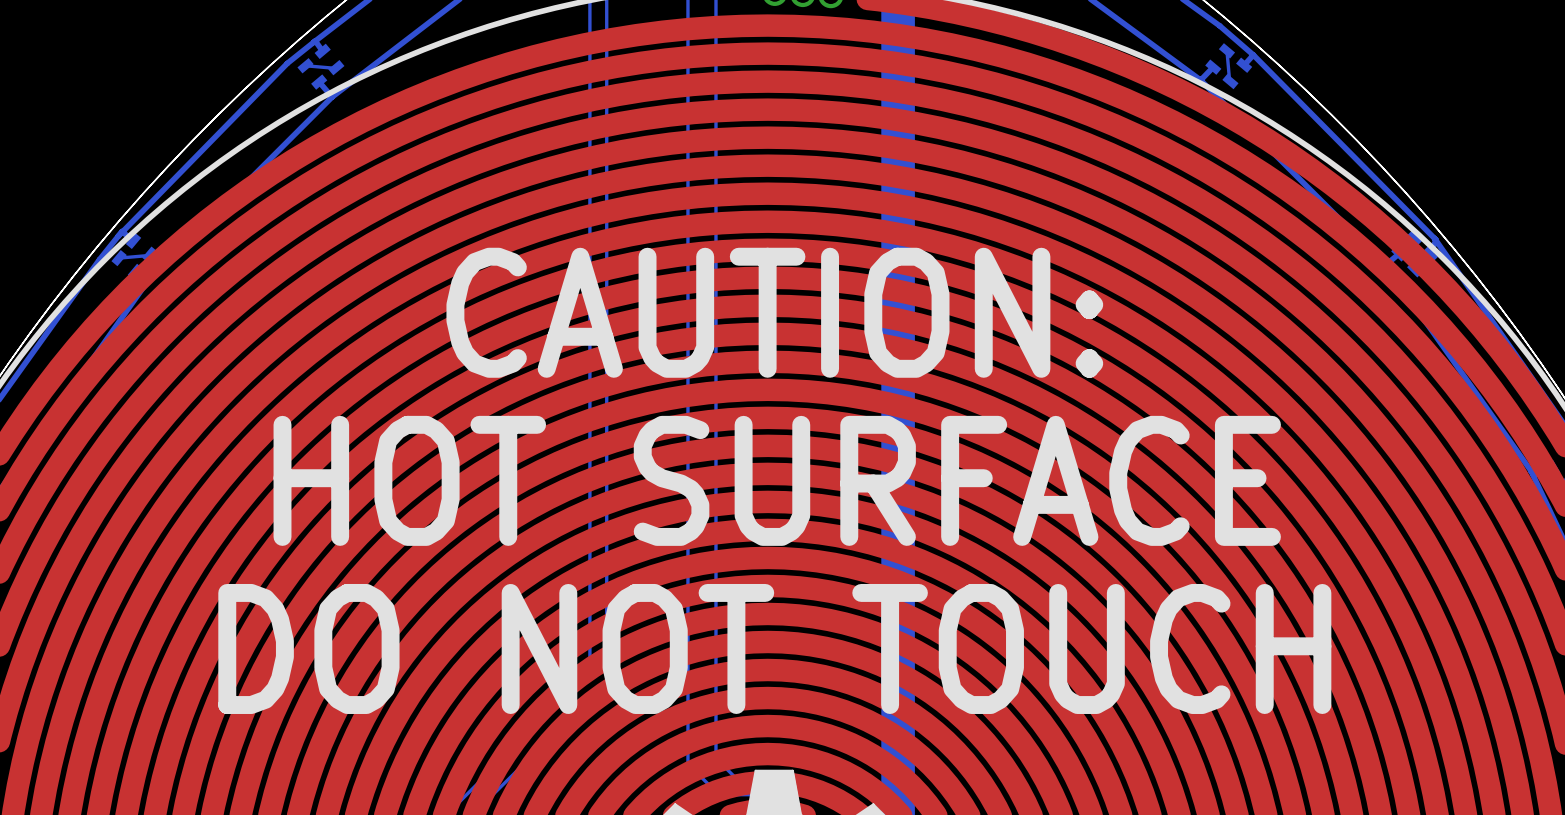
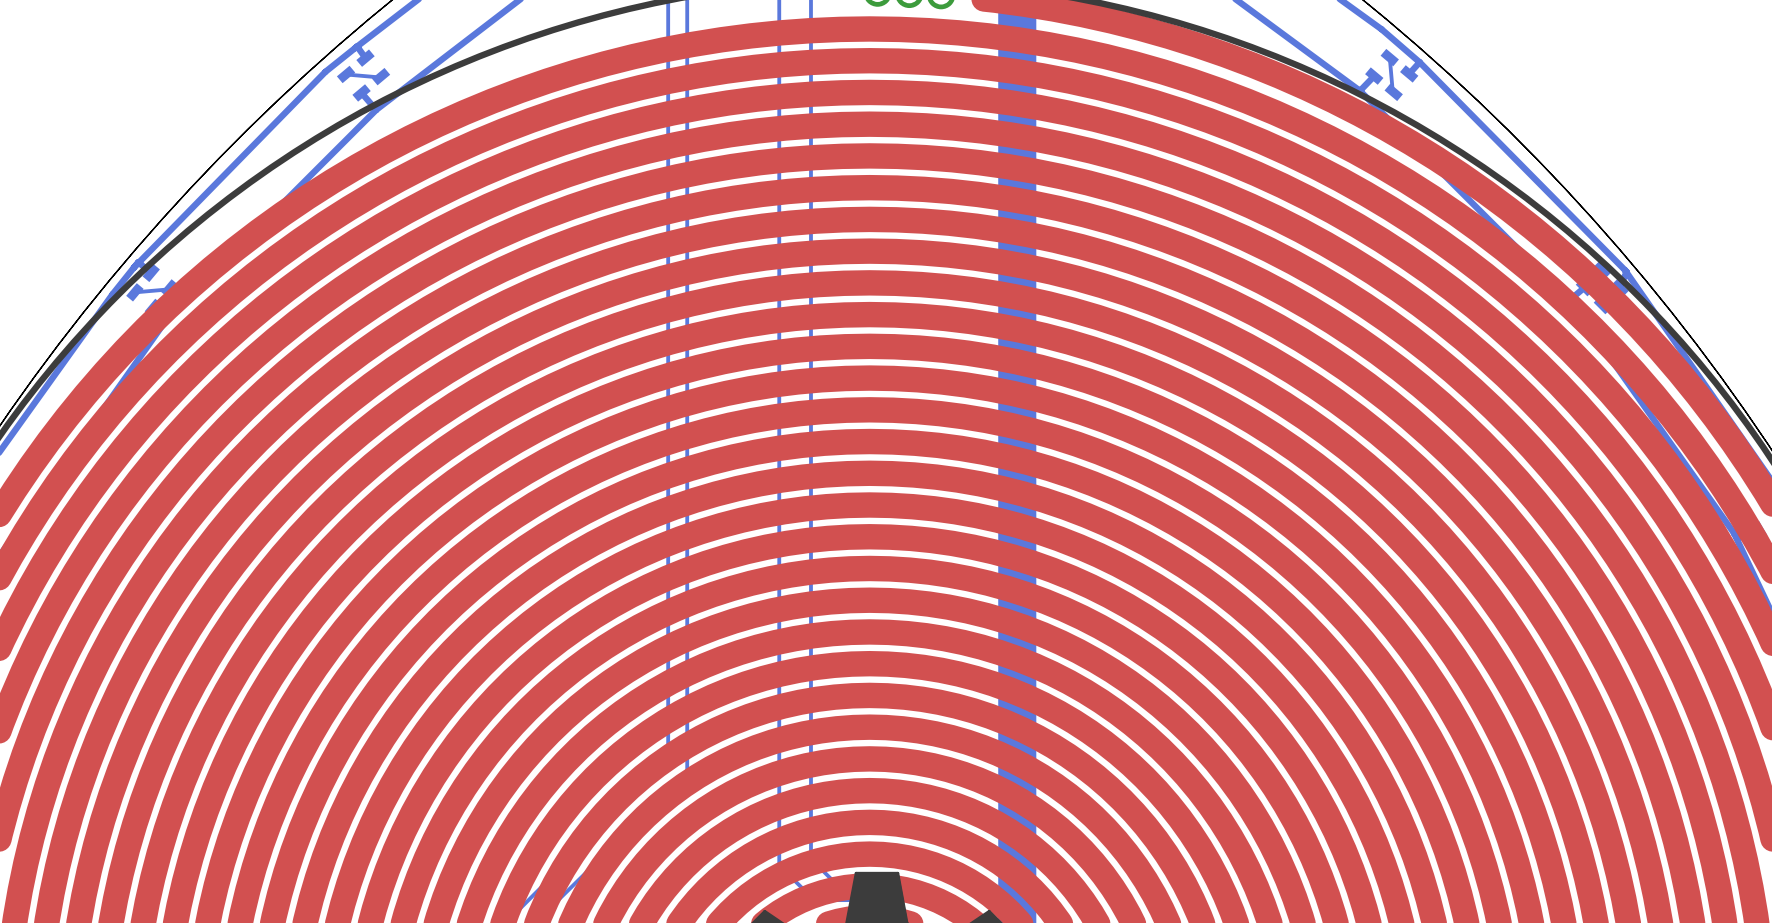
text: CAUTION: (774, 312) -> none
text: HOT SURFACE (777, 480) -> none
text: DO NOT TOUCH (774, 648) -> none

